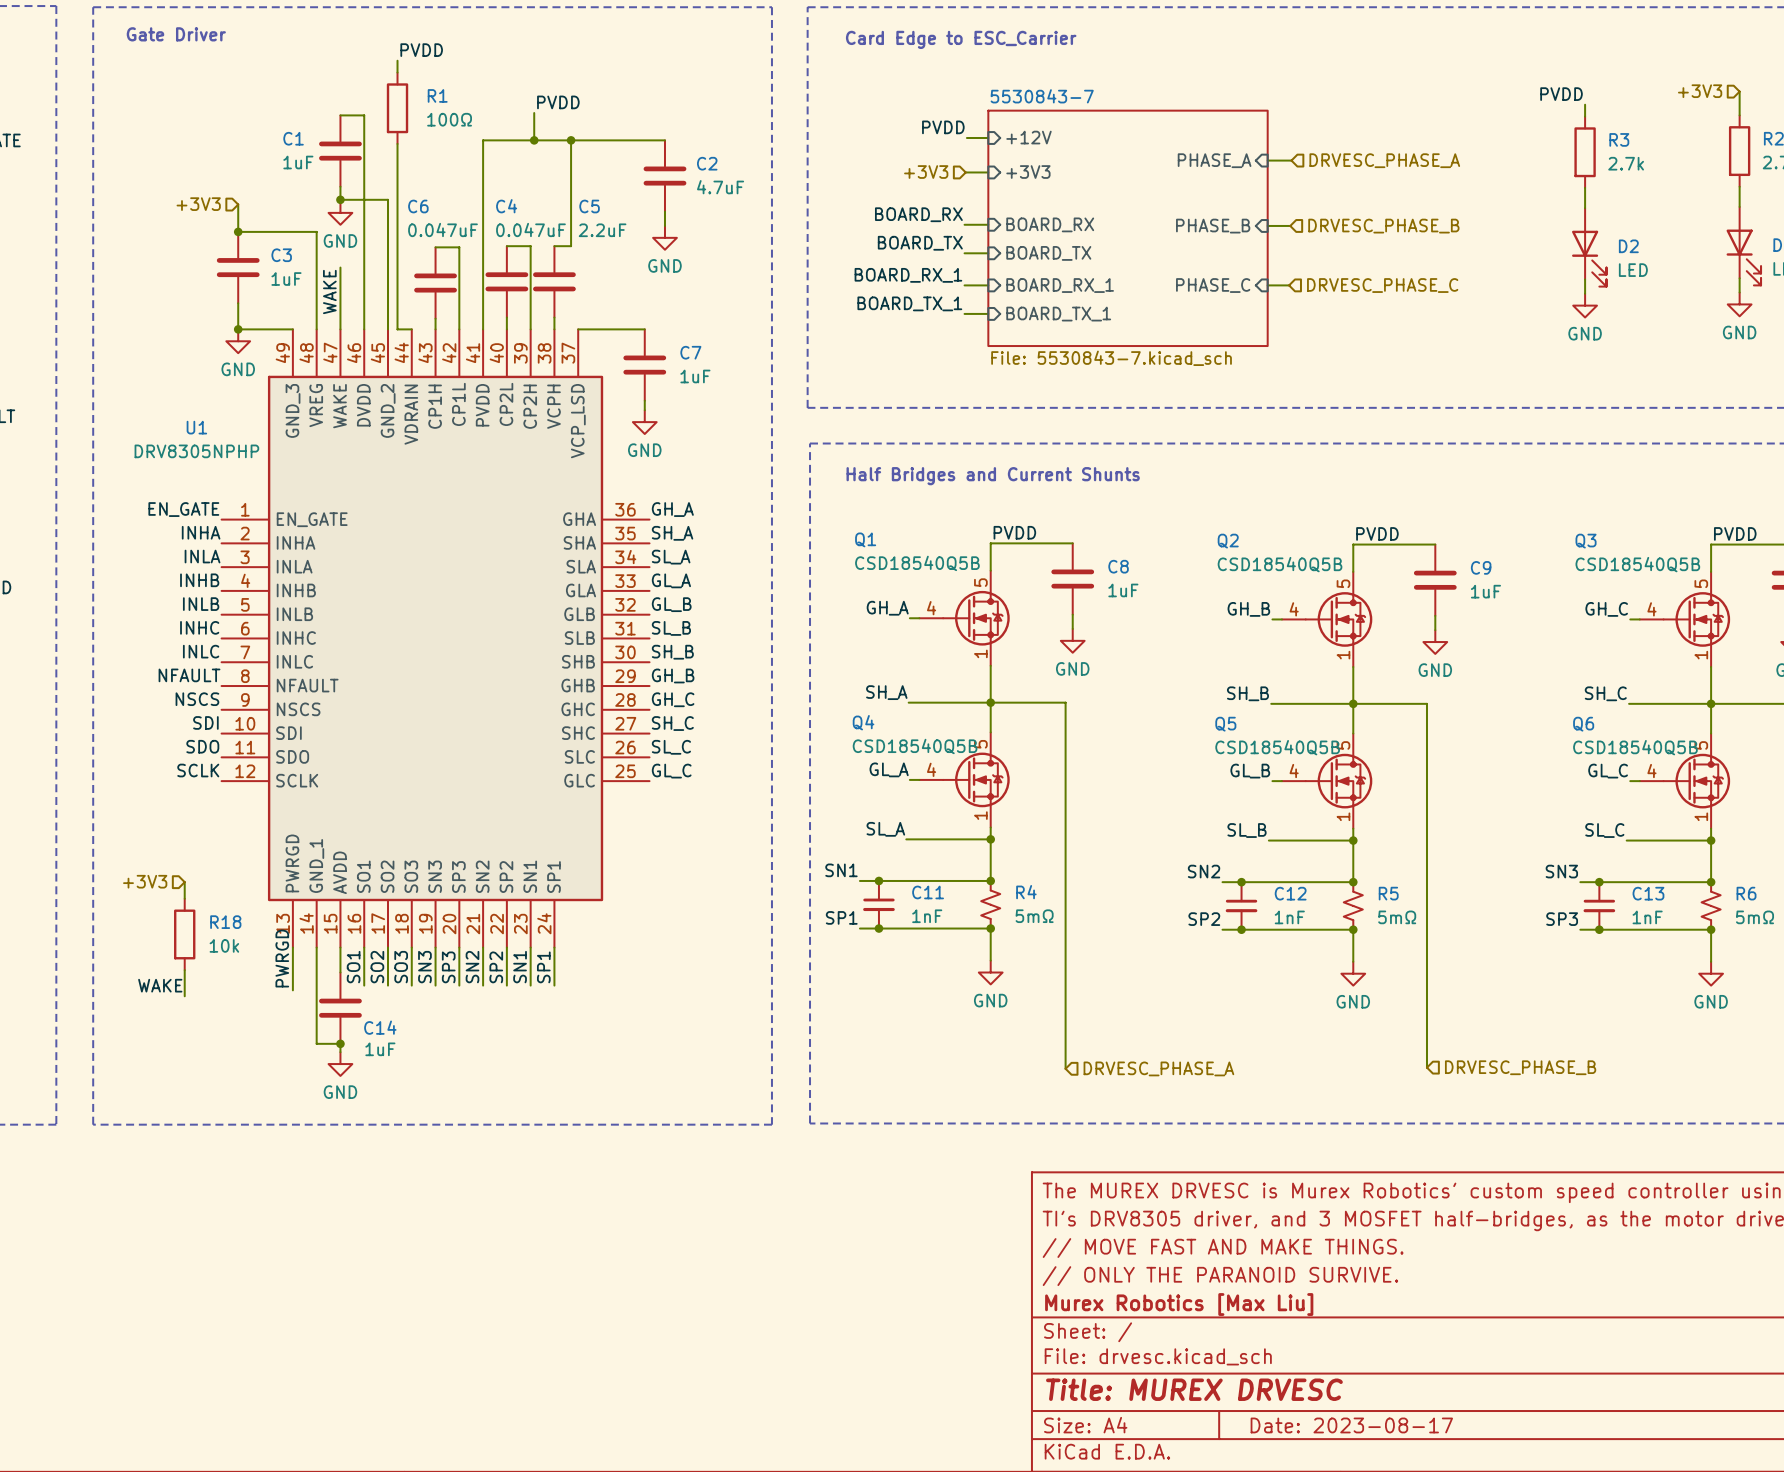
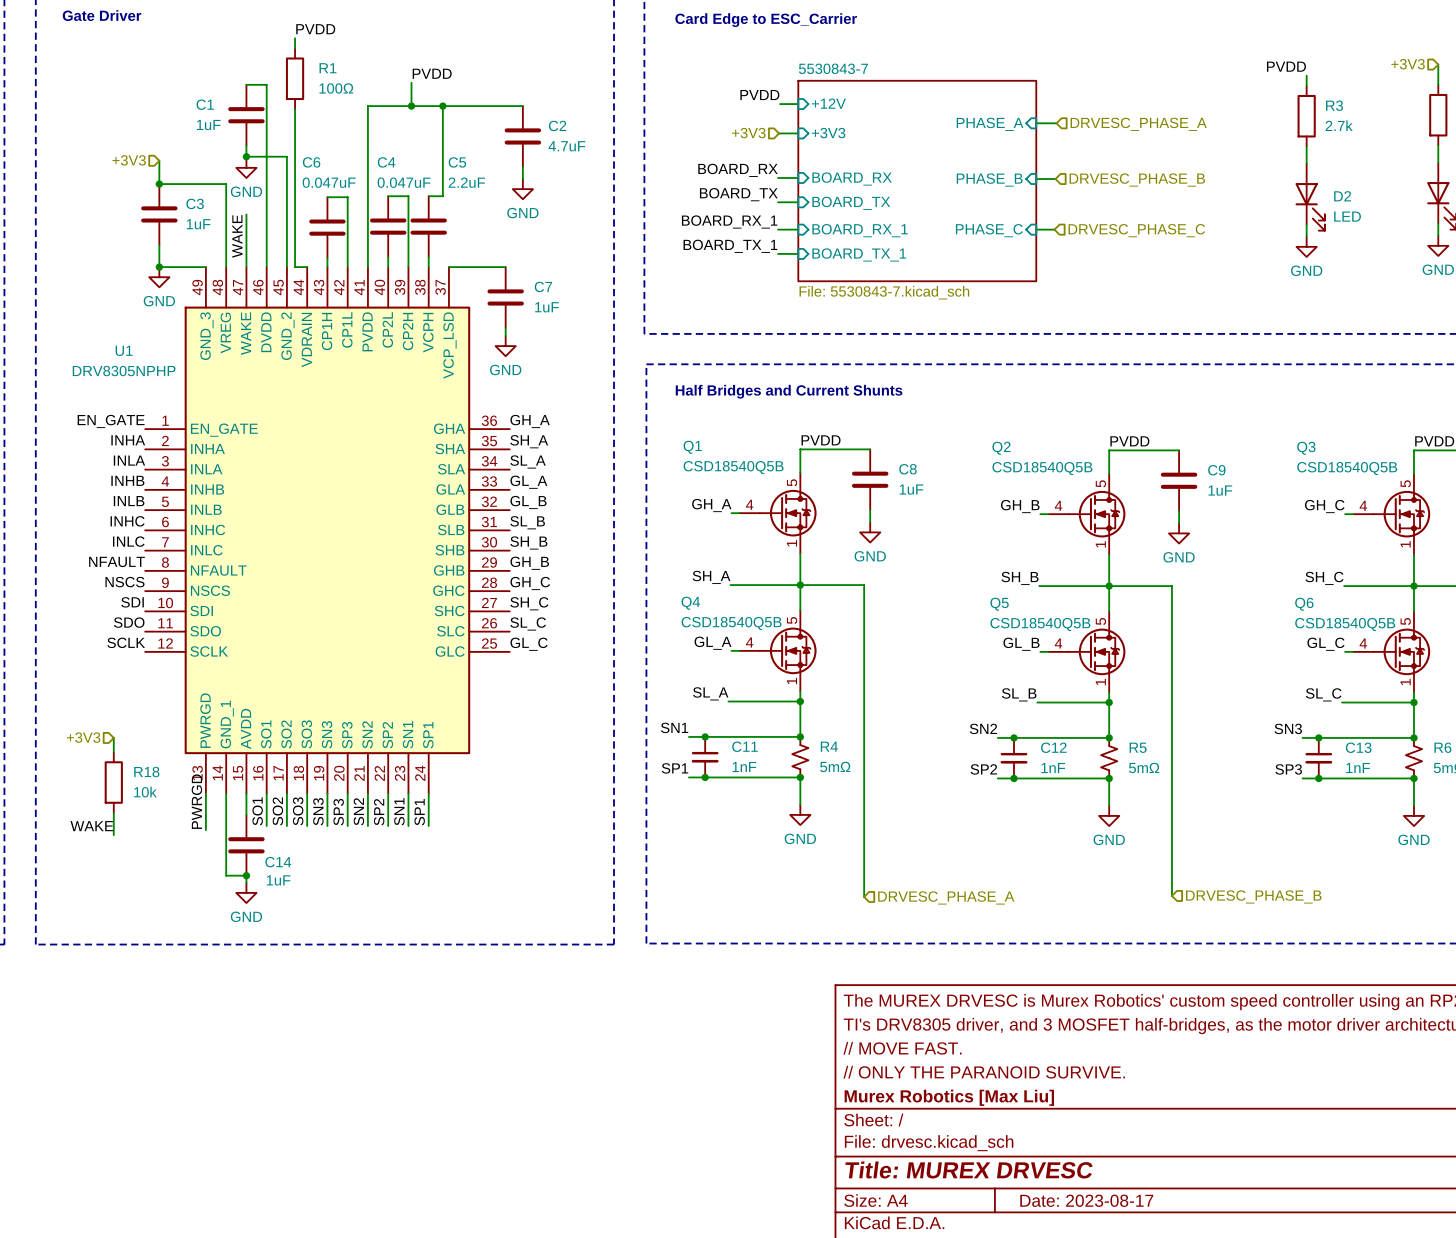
title block: // MOVE FAST AND MAKE THINGS. (1223, 1248) -> // MOVE FAST. (902, 1048)

